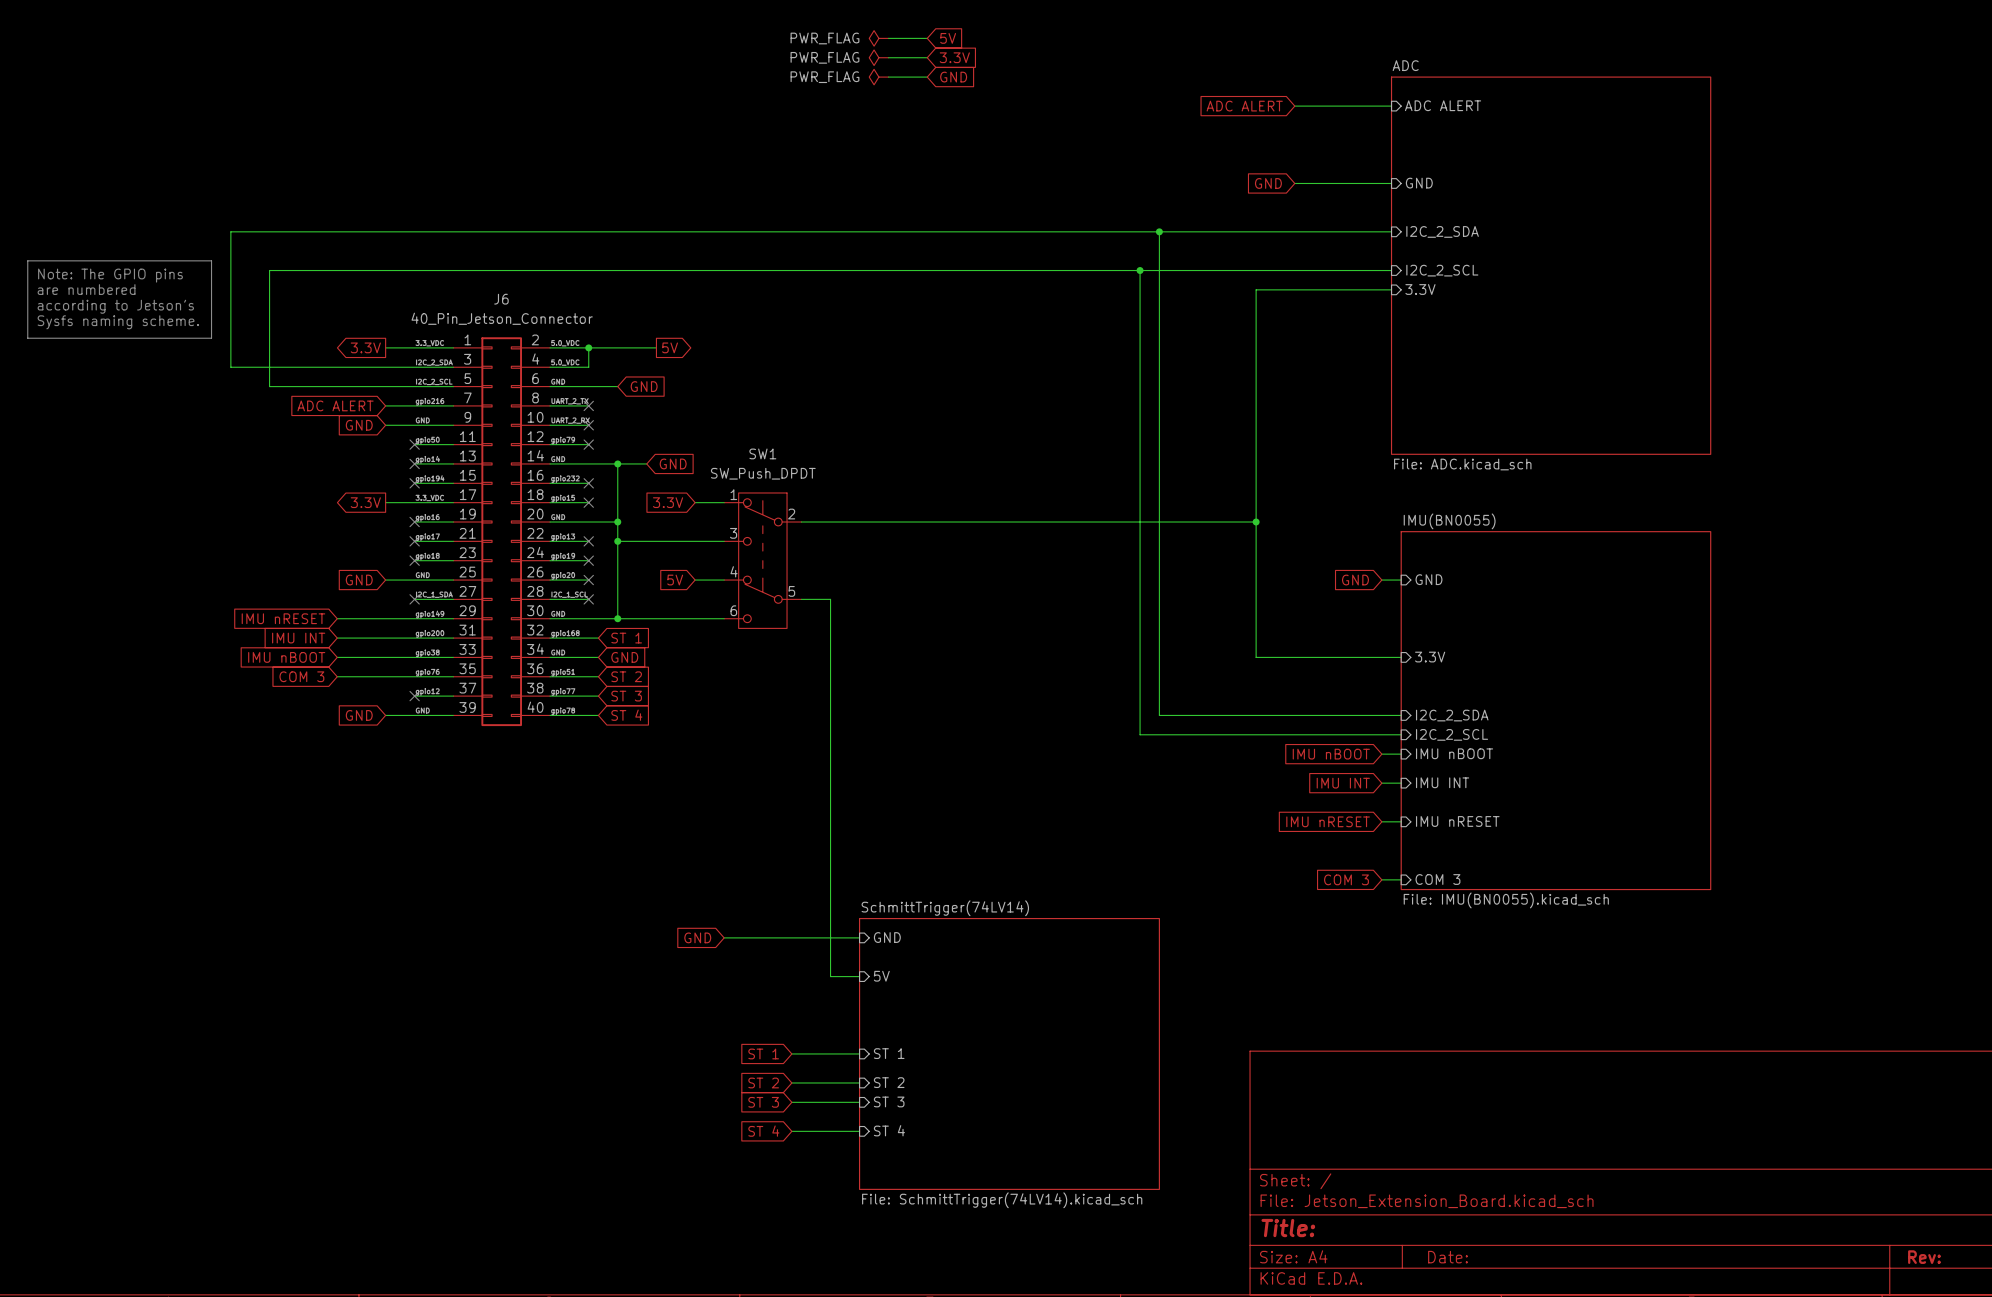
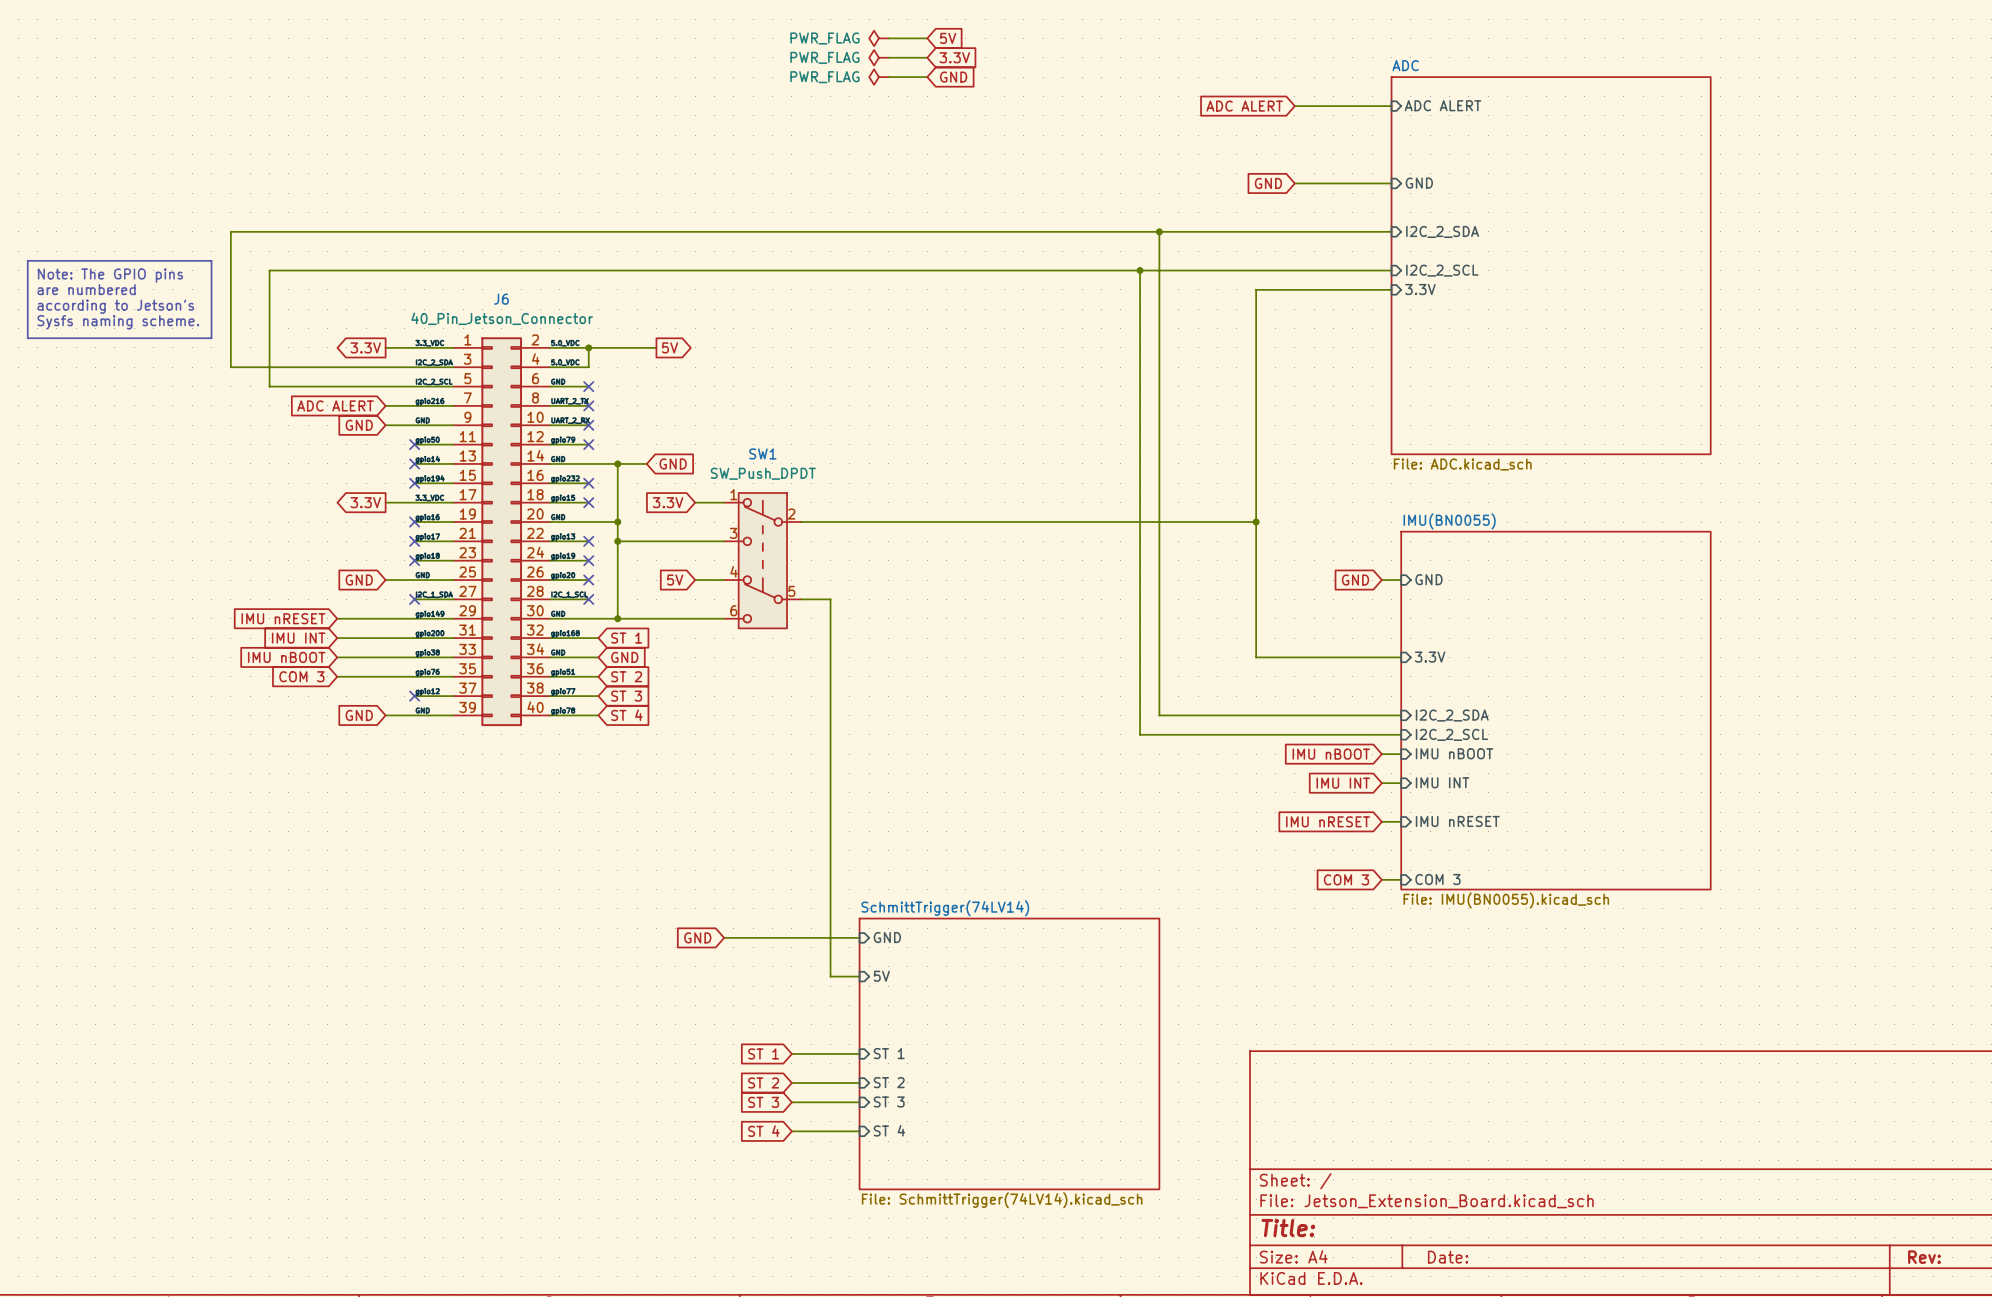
wire: (588, 386) (617, 386) -> none
no-connect mark: none -> (588, 386)
global label: GND (644, 386) -> none

